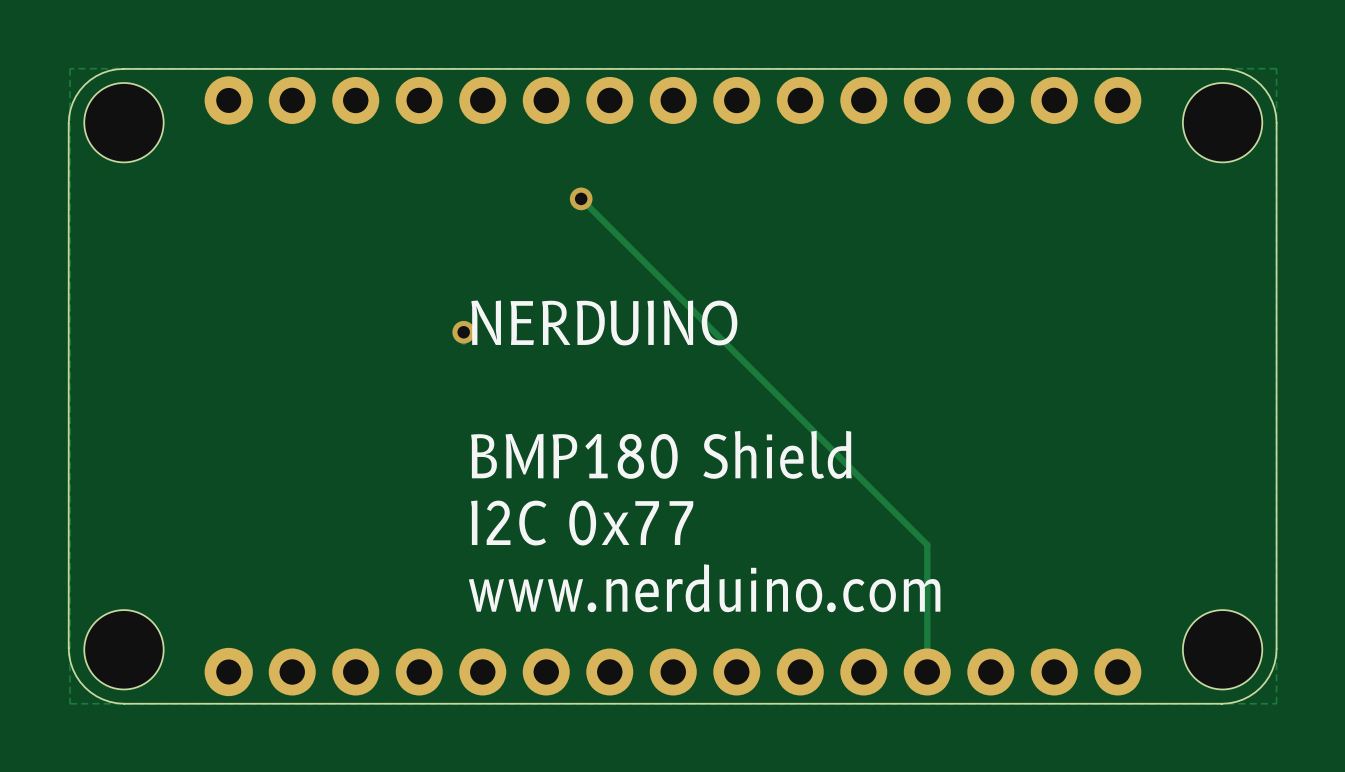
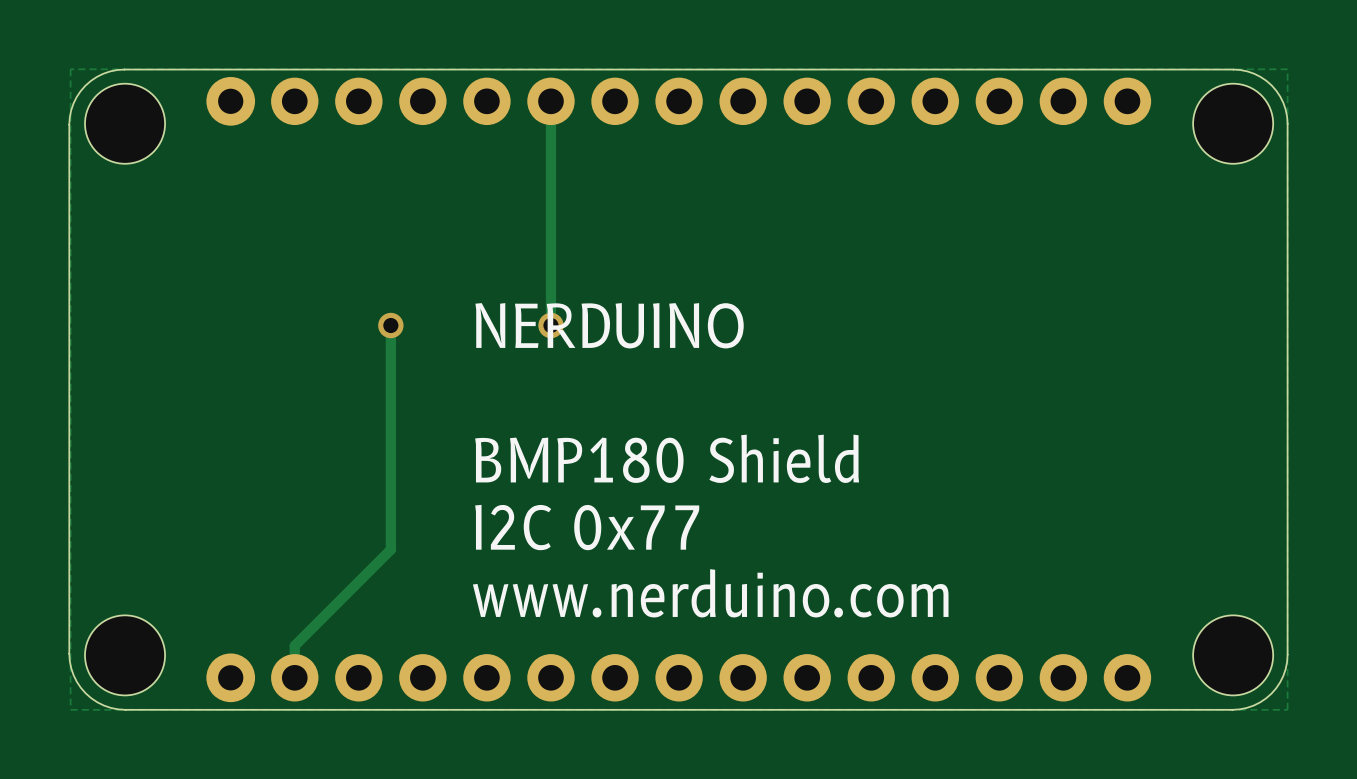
track: none -> (550, 101) (550, 325)
track: (581, 198) (927, 544) (927, 672) -> none
via: (581, 198) -> none
track: none -> (390, 325) (390, 549) (294, 645) (294, 677)
via: none -> (390, 325)
via: none -> (550, 325)
via: (463, 332) -> none

